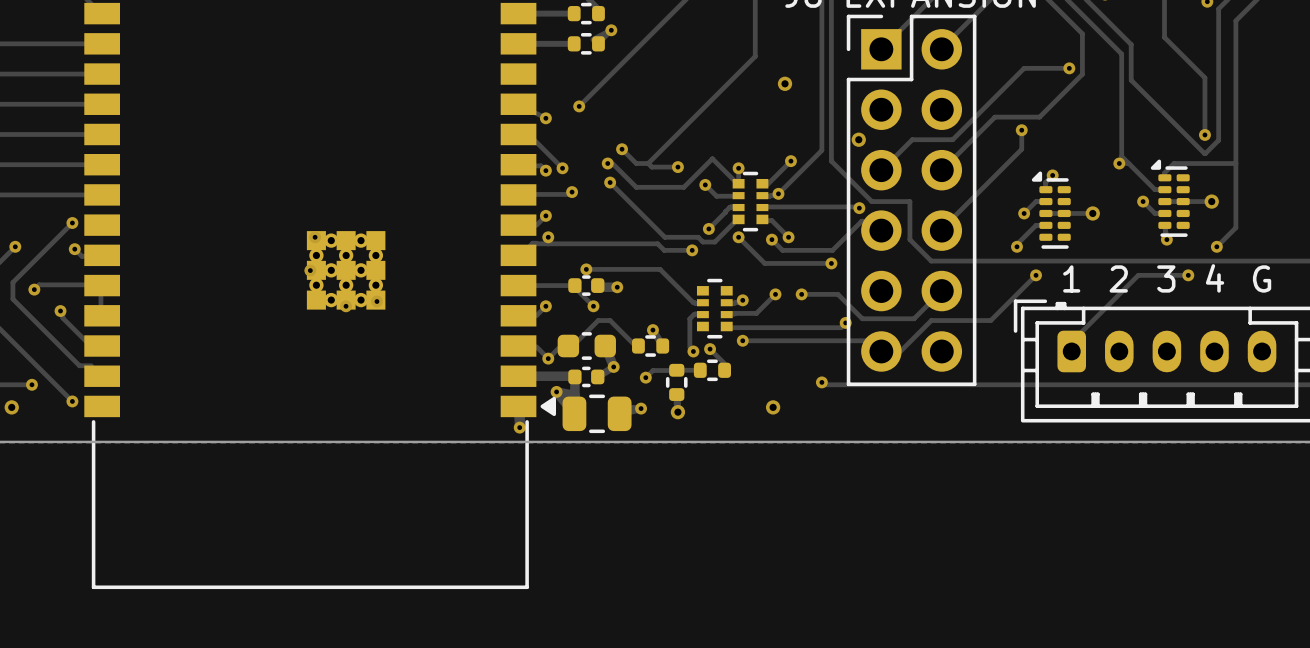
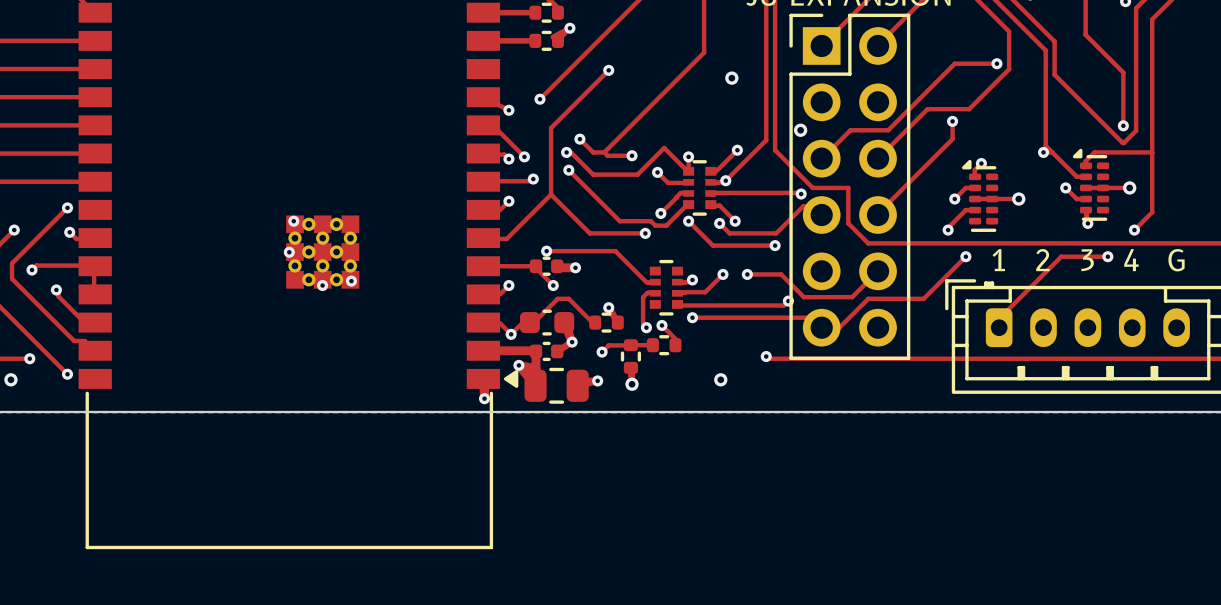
track: none -> (608, 70) (551, 128) (551, 194)
via: none -> (608, 70)
track: none -> (551, 194) (589, 233) (619, 233)
via: (548, 237) -> none
track: (664, 250) (657, 243) (532, 243) (519, 256) -> (551, 194) (506, 238) (484, 238)

